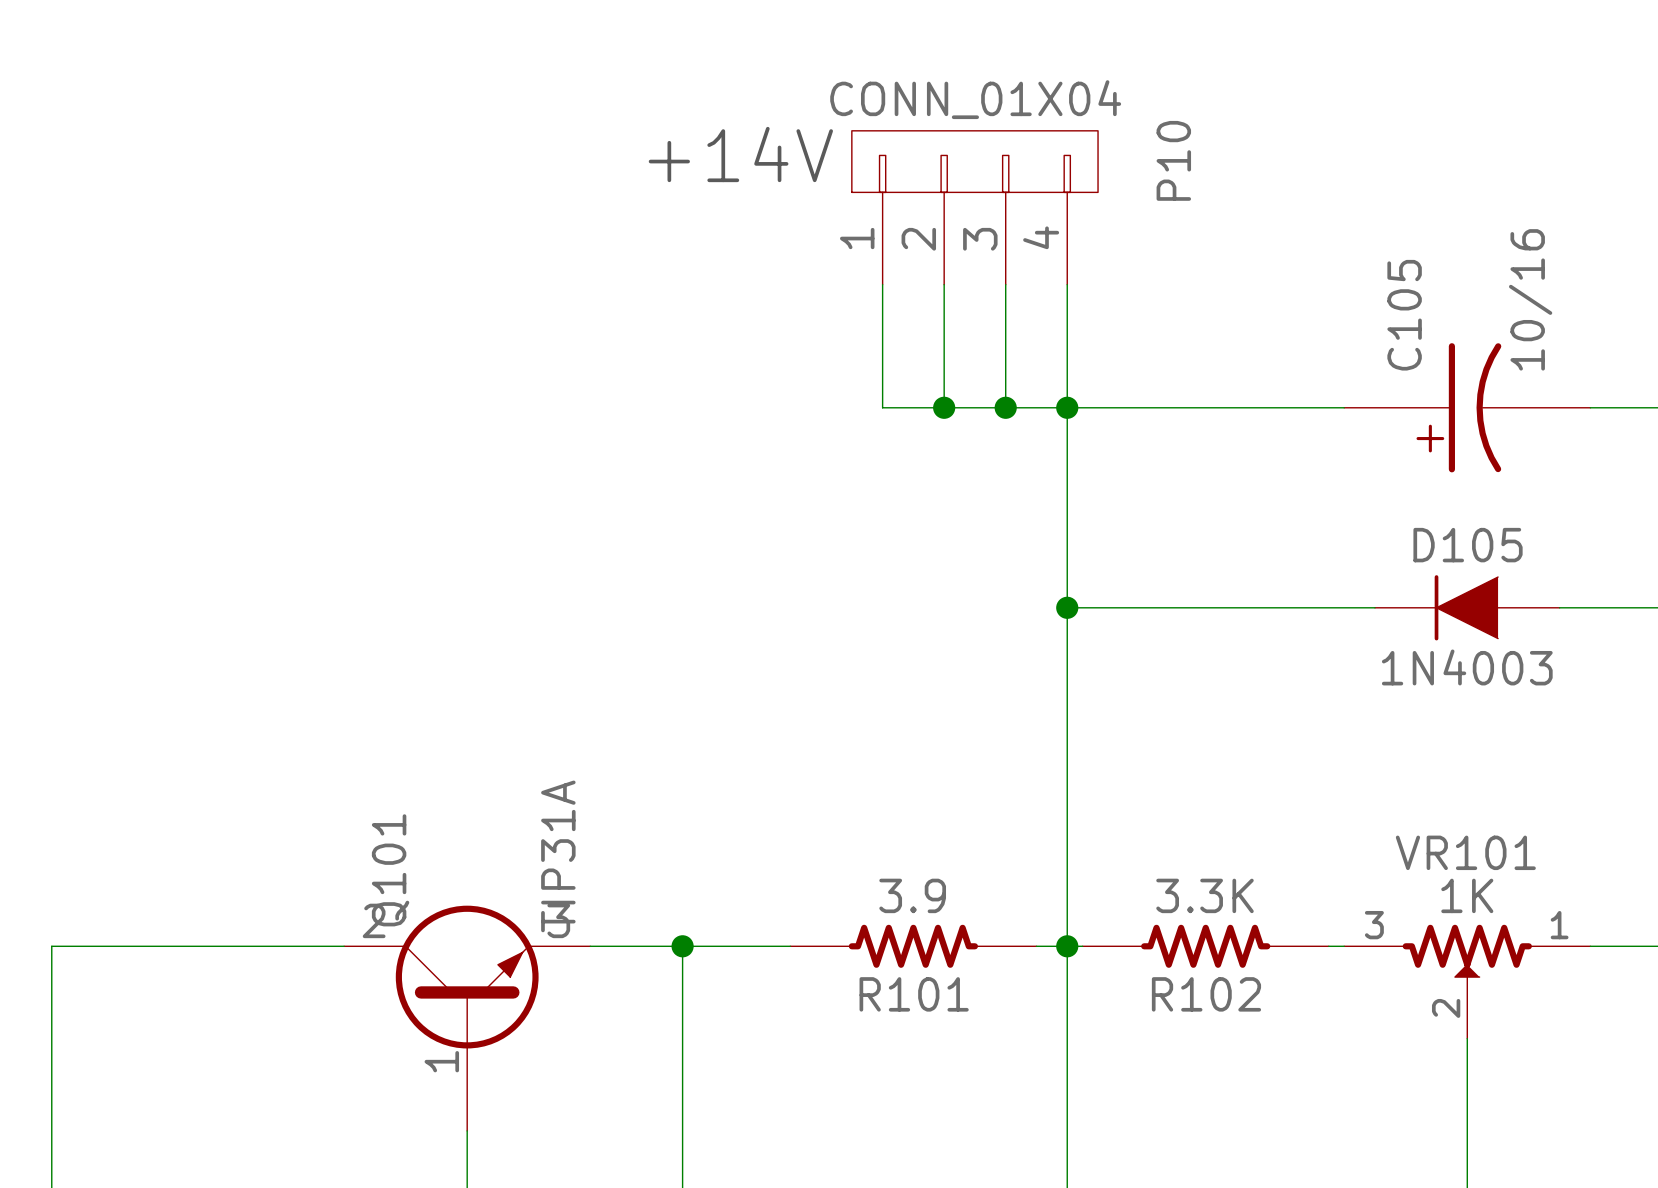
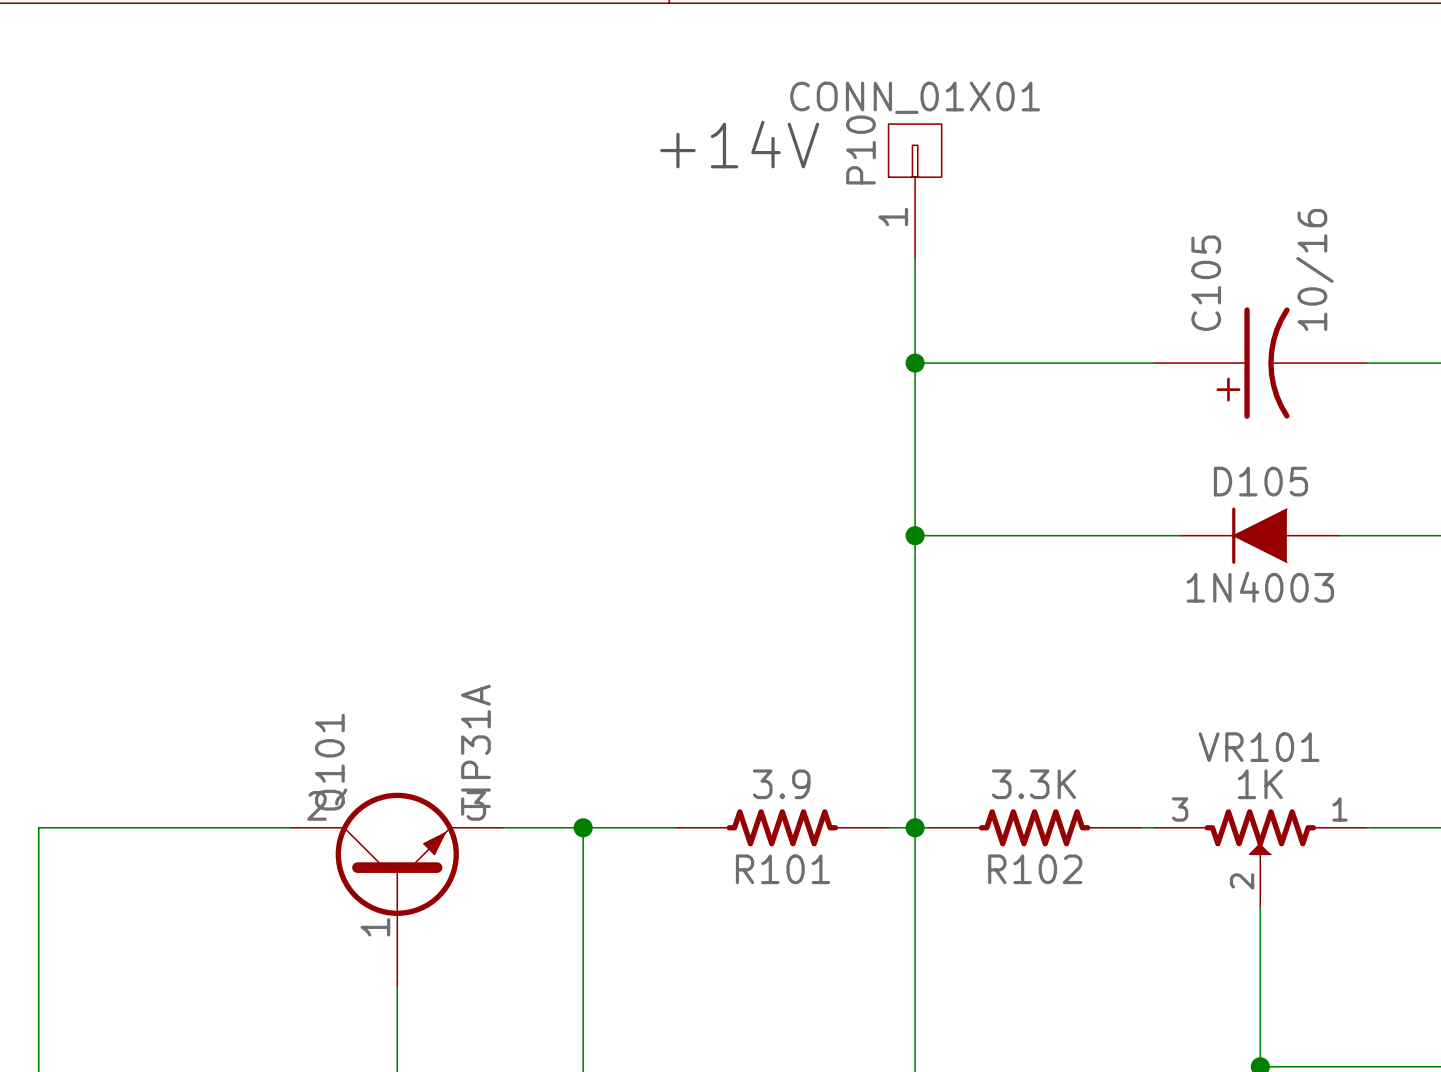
P10 value: CONN_01X04 (975, 99) -> CONN_01X01 (915, 97)
P10 symbol: [851, 130, 1099, 285] -> [888, 124, 942, 257]
text position: +14V (740, 154) -> +14V (739, 144)
P10 name position: P10 (1173, 160) -> P10 (861, 150)
wire: (882, 284) (882, 407) (1067, 407) -> none
wire: (944, 284) (944, 407) -> none
wire: (1005, 284) (1005, 407) -> none
junction: (944, 407) -> none
junction: (1005, 407) -> none

